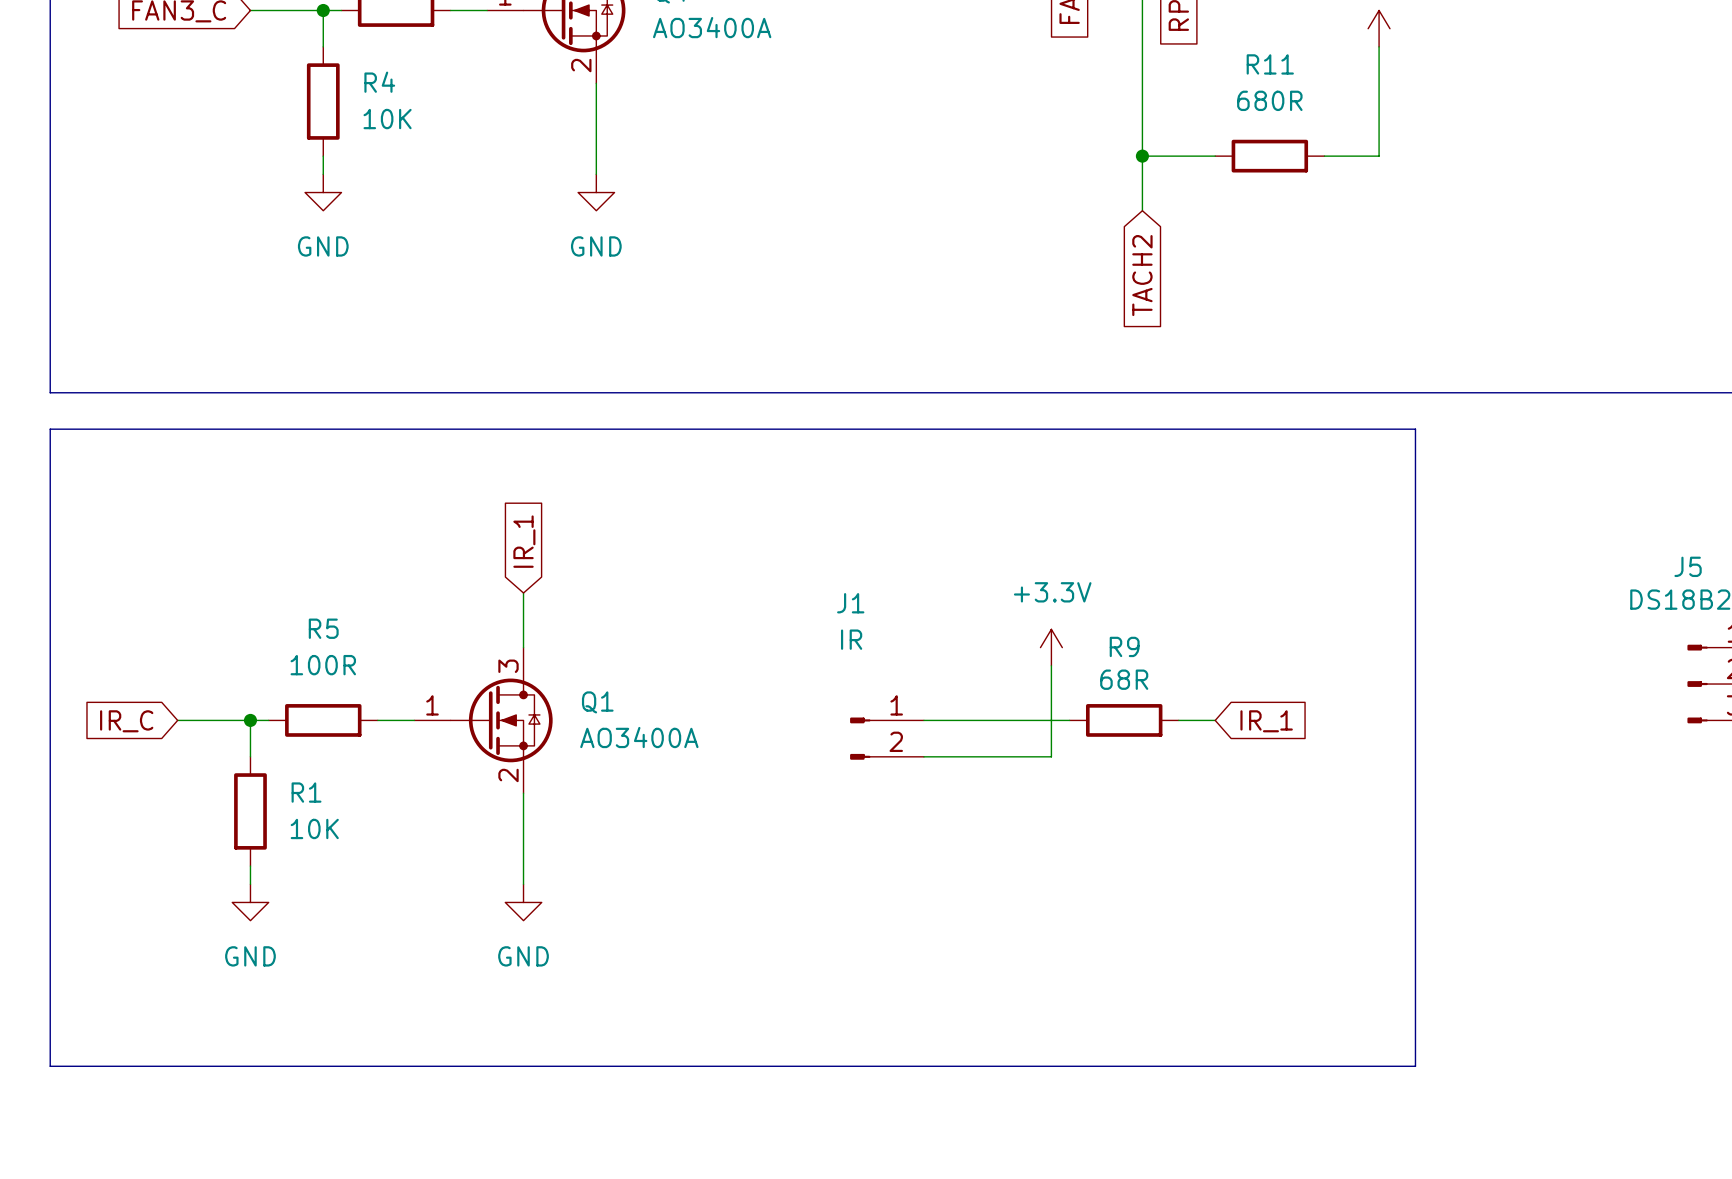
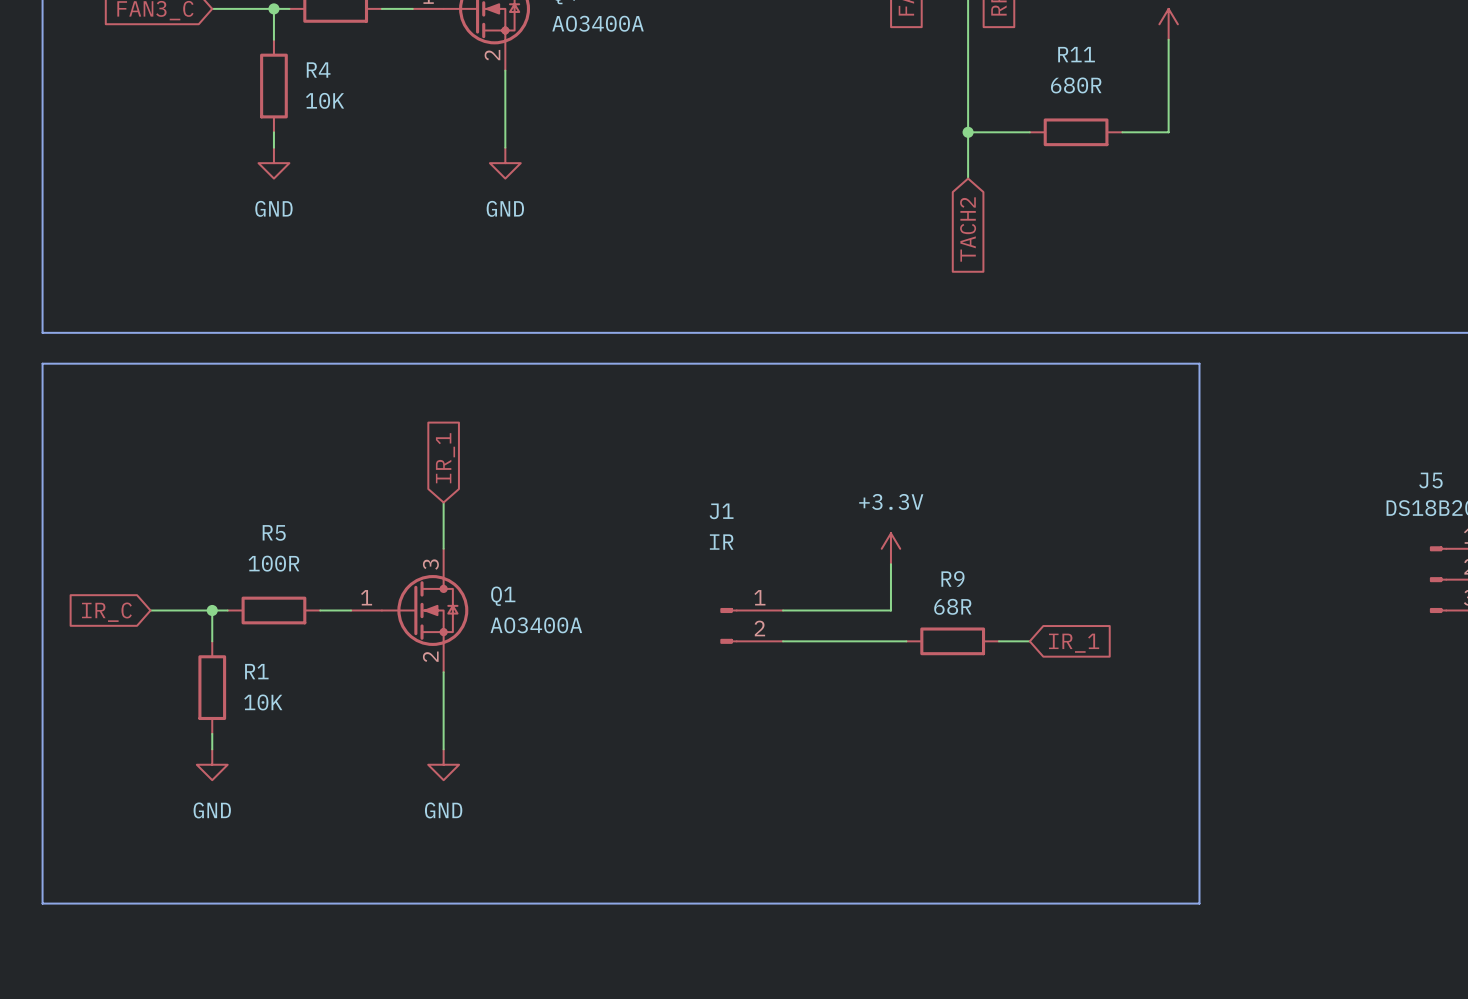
wire: (1069, 720) (1051, 720) (1051, 756) -> (906, 641) (890, 641)
R9 position: (1124, 720) -> (952, 641)
wire: (1178, 720) (1215, 720) -> (998, 641) (1029, 641)
global label position: IR_1 (1266, 721) -> IR_1 (1074, 643)

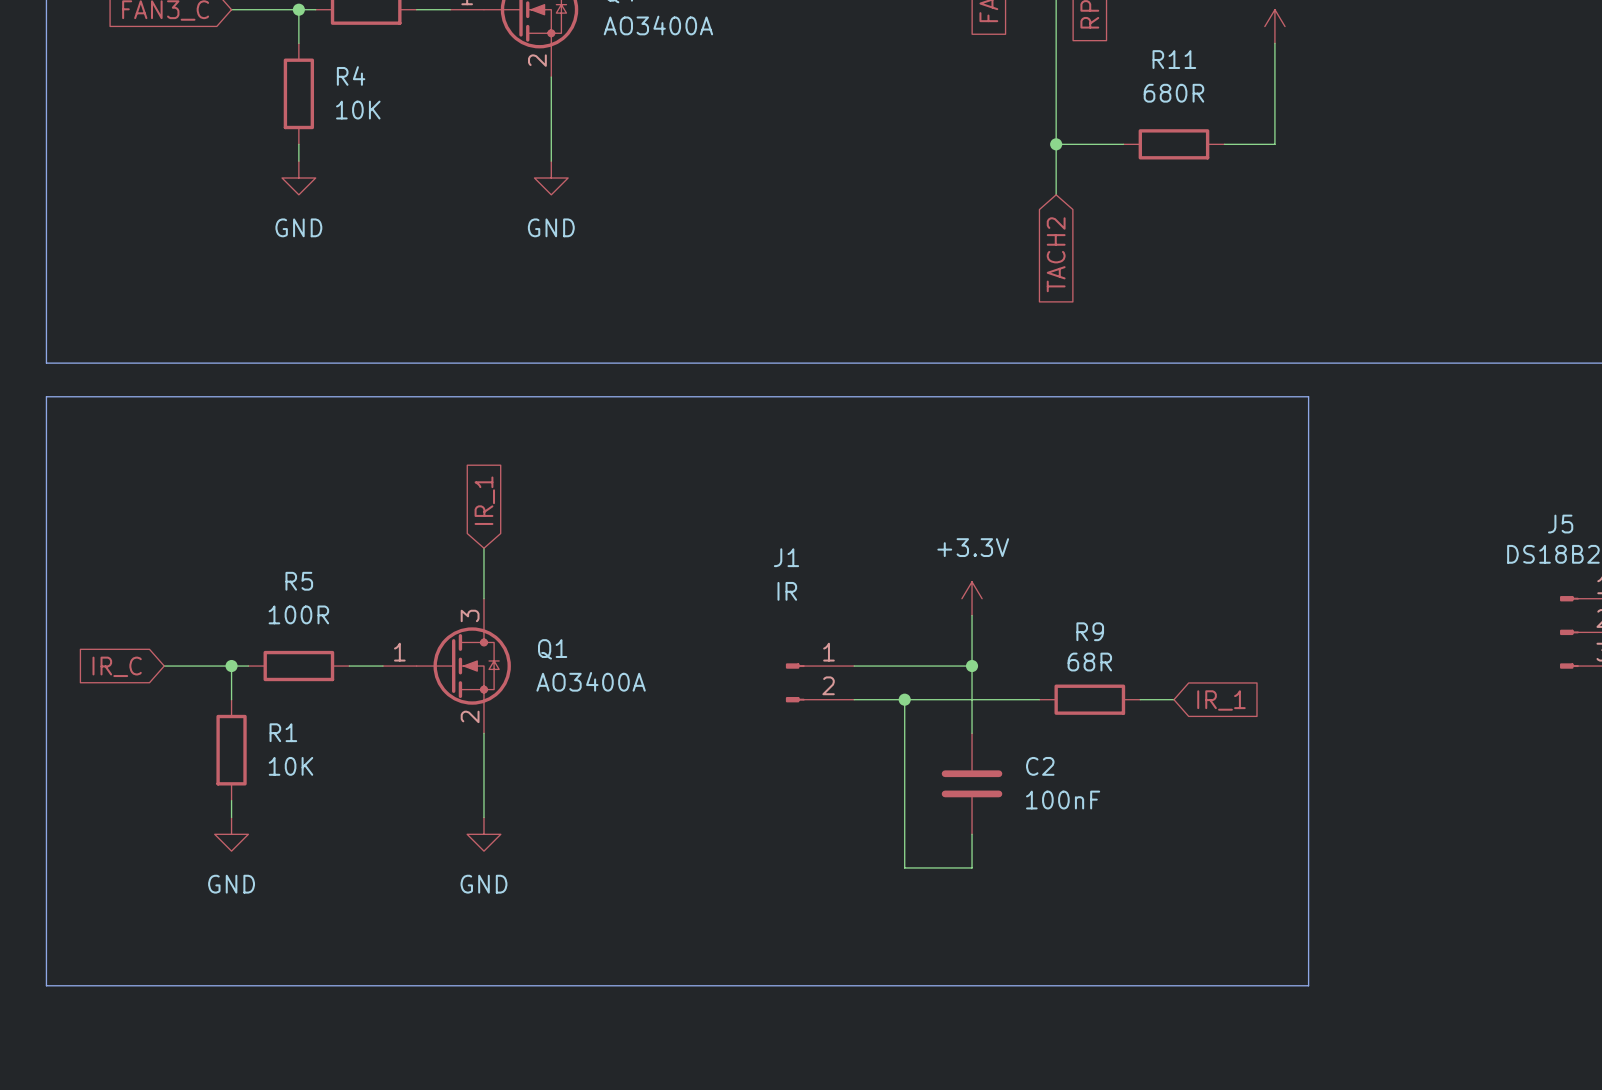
wire: none -> (972, 666) (972, 733)
junction: none -> (972, 666)
wire: none -> (904, 699) (904, 867) (972, 867) (972, 834)
junction: none -> (904, 699)
wire: none -> (988, 699) (1039, 699)
R9 position: (952, 641) -> (1089, 699)
wire: (998, 641) (1029, 641) -> (1140, 699) (1173, 699)
global label position: IR_1 (1074, 643) -> IR_1 (1221, 700)
C2: none -> 100nF (972, 783)

